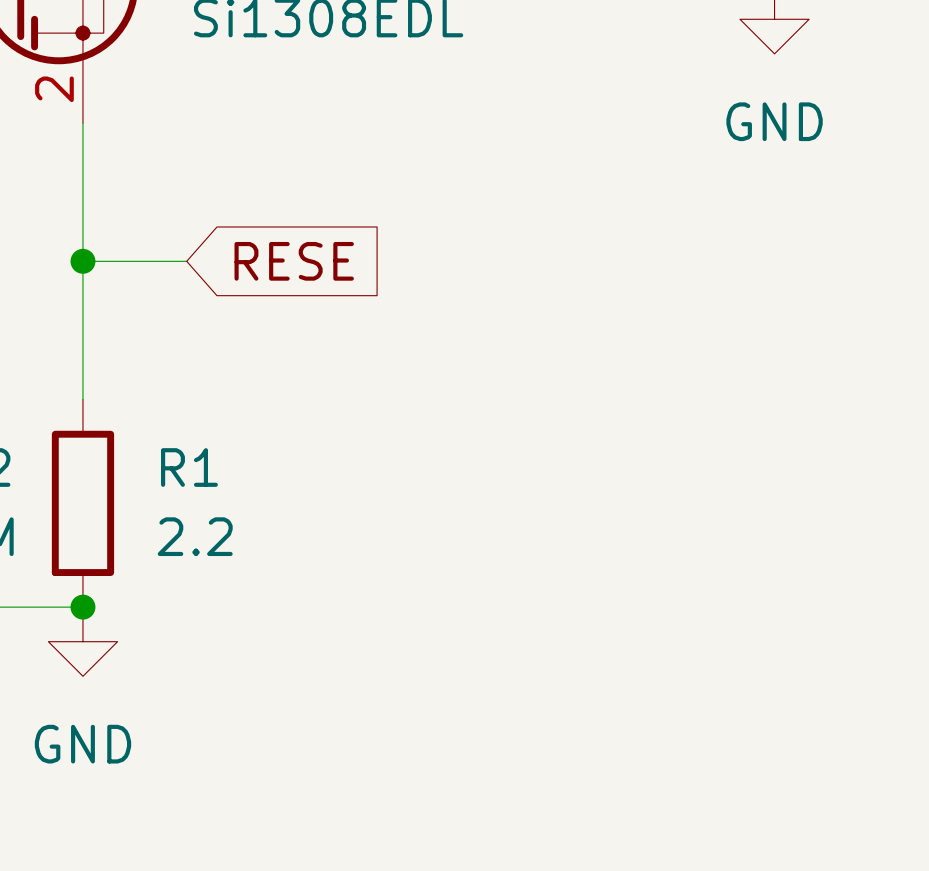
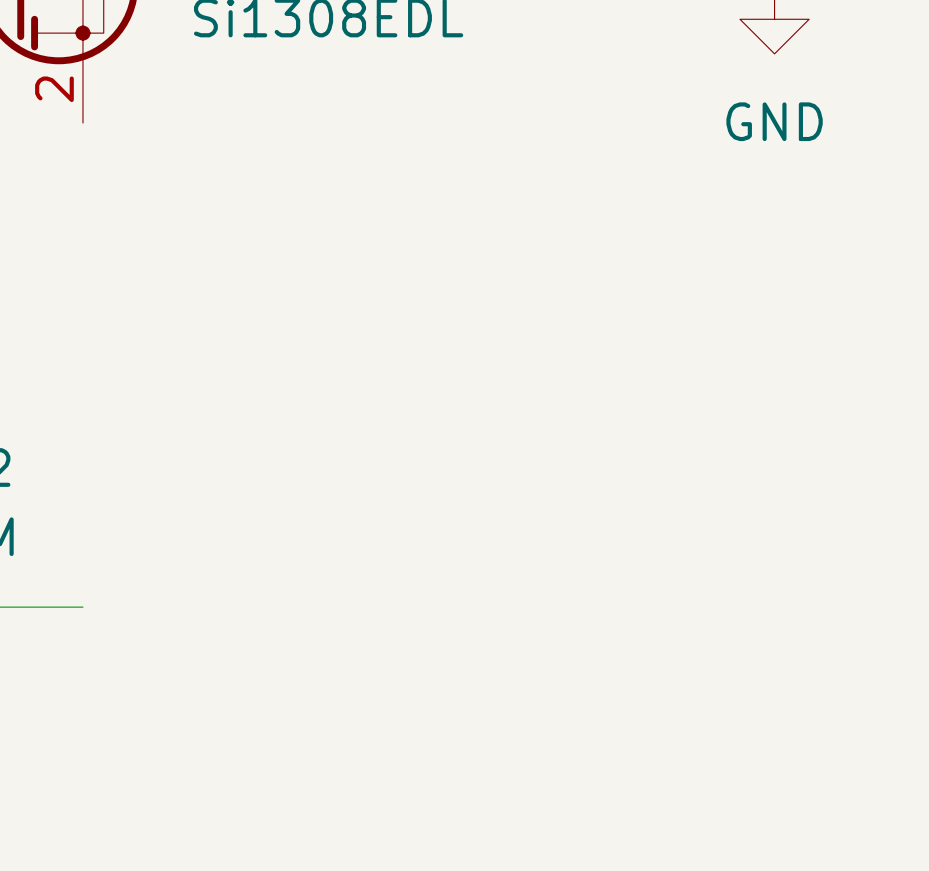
wire: (82, 123) (82, 399) -> none
wire: (82, 261) (186, 261) -> none
junction: (82, 261) -> none
global label: RESE (294, 261) -> none
R1: 2.2 (82, 503) -> none
junction: (82, 607) -> none
power symbol: GND (82, 641) -> none

